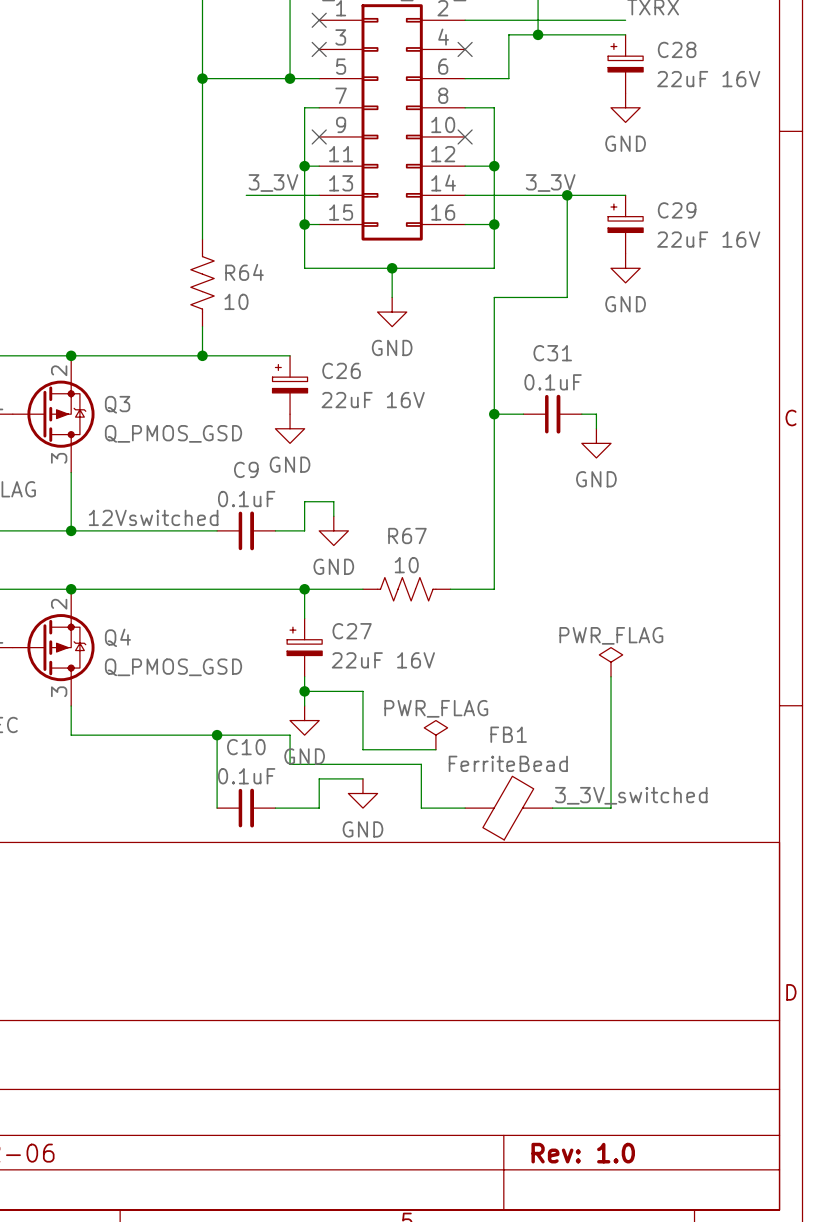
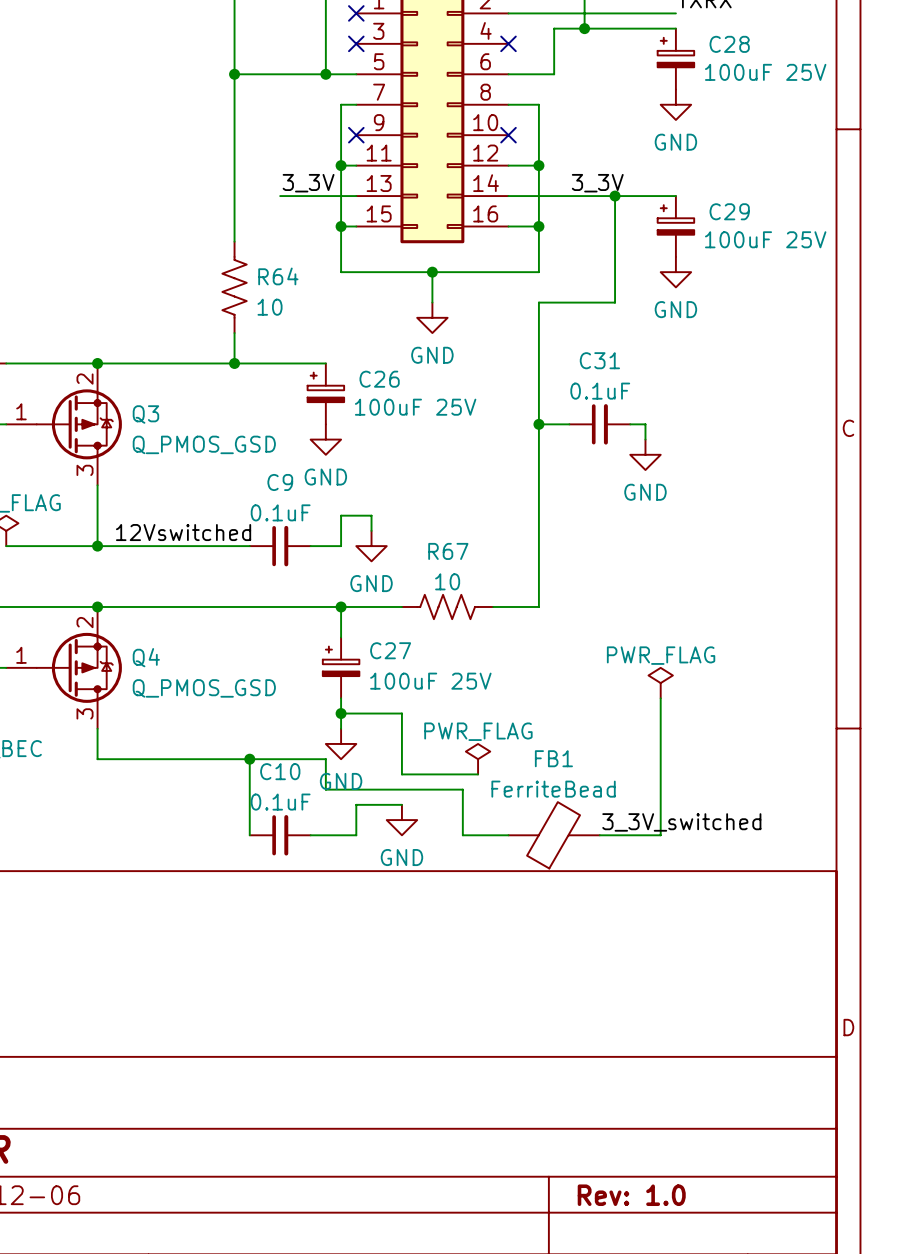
C28 value: 22uF 16V (708, 79) -> 100uF 25V (765, 72)
C29 value: 22uF 16V (708, 239) -> 100uF 25V (765, 239)
C26 value: 22uF 16V (373, 400) -> 100uF 25V (415, 407)
C27 value: 22uF 16V (383, 660) -> 100uF 25V (430, 681)

